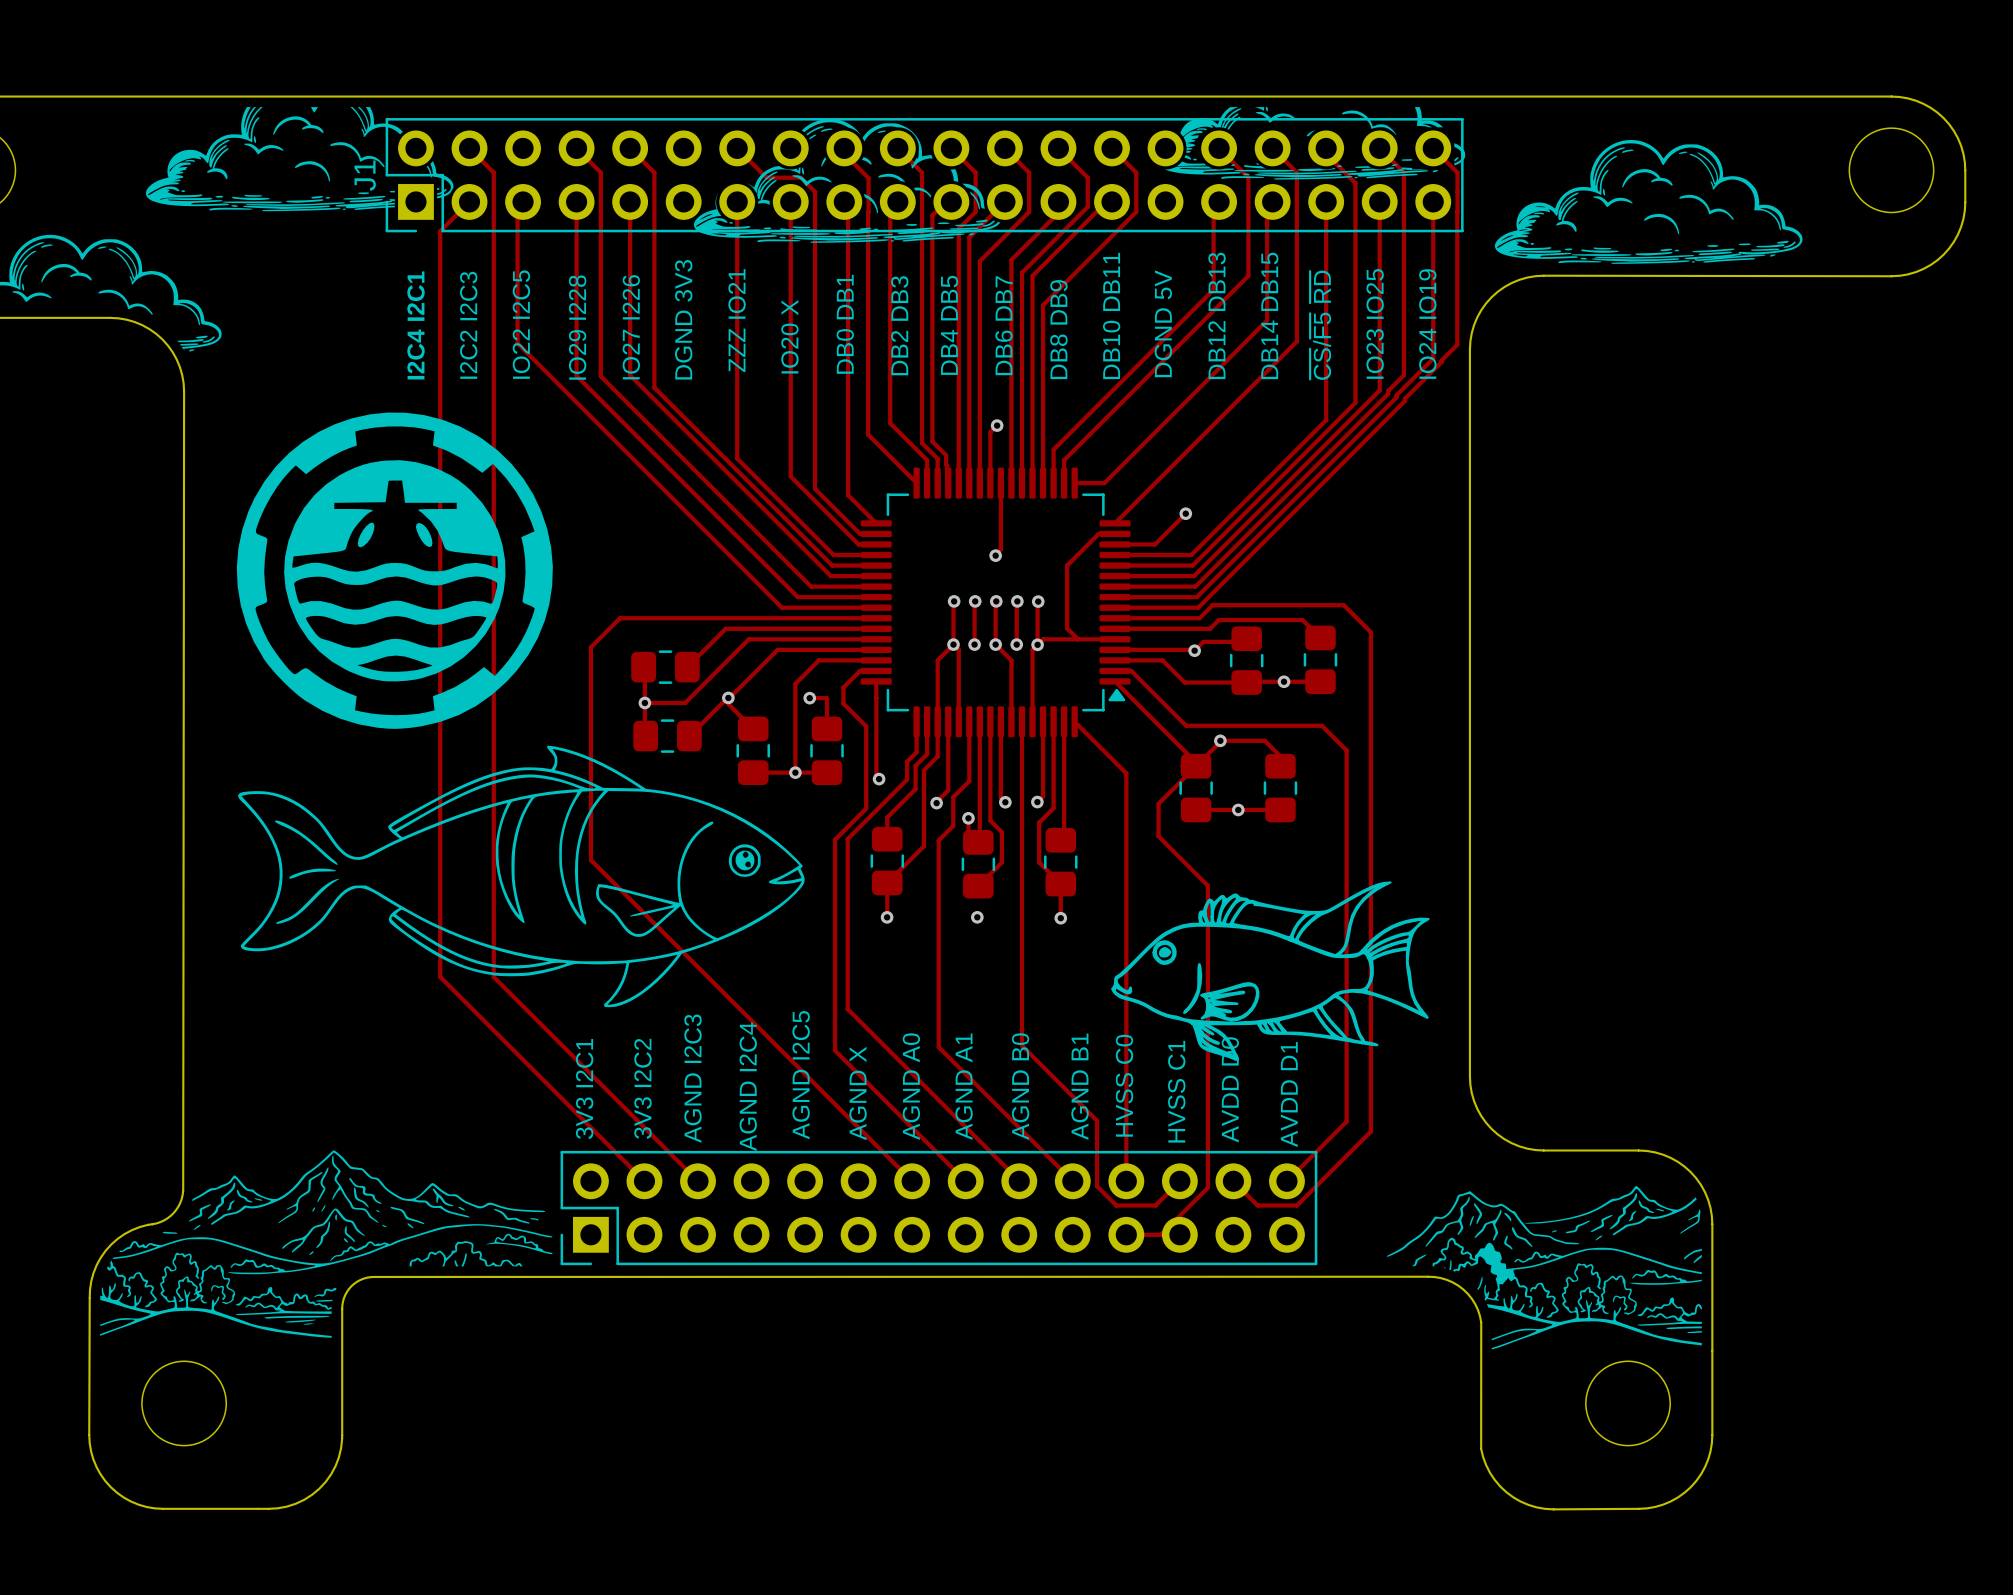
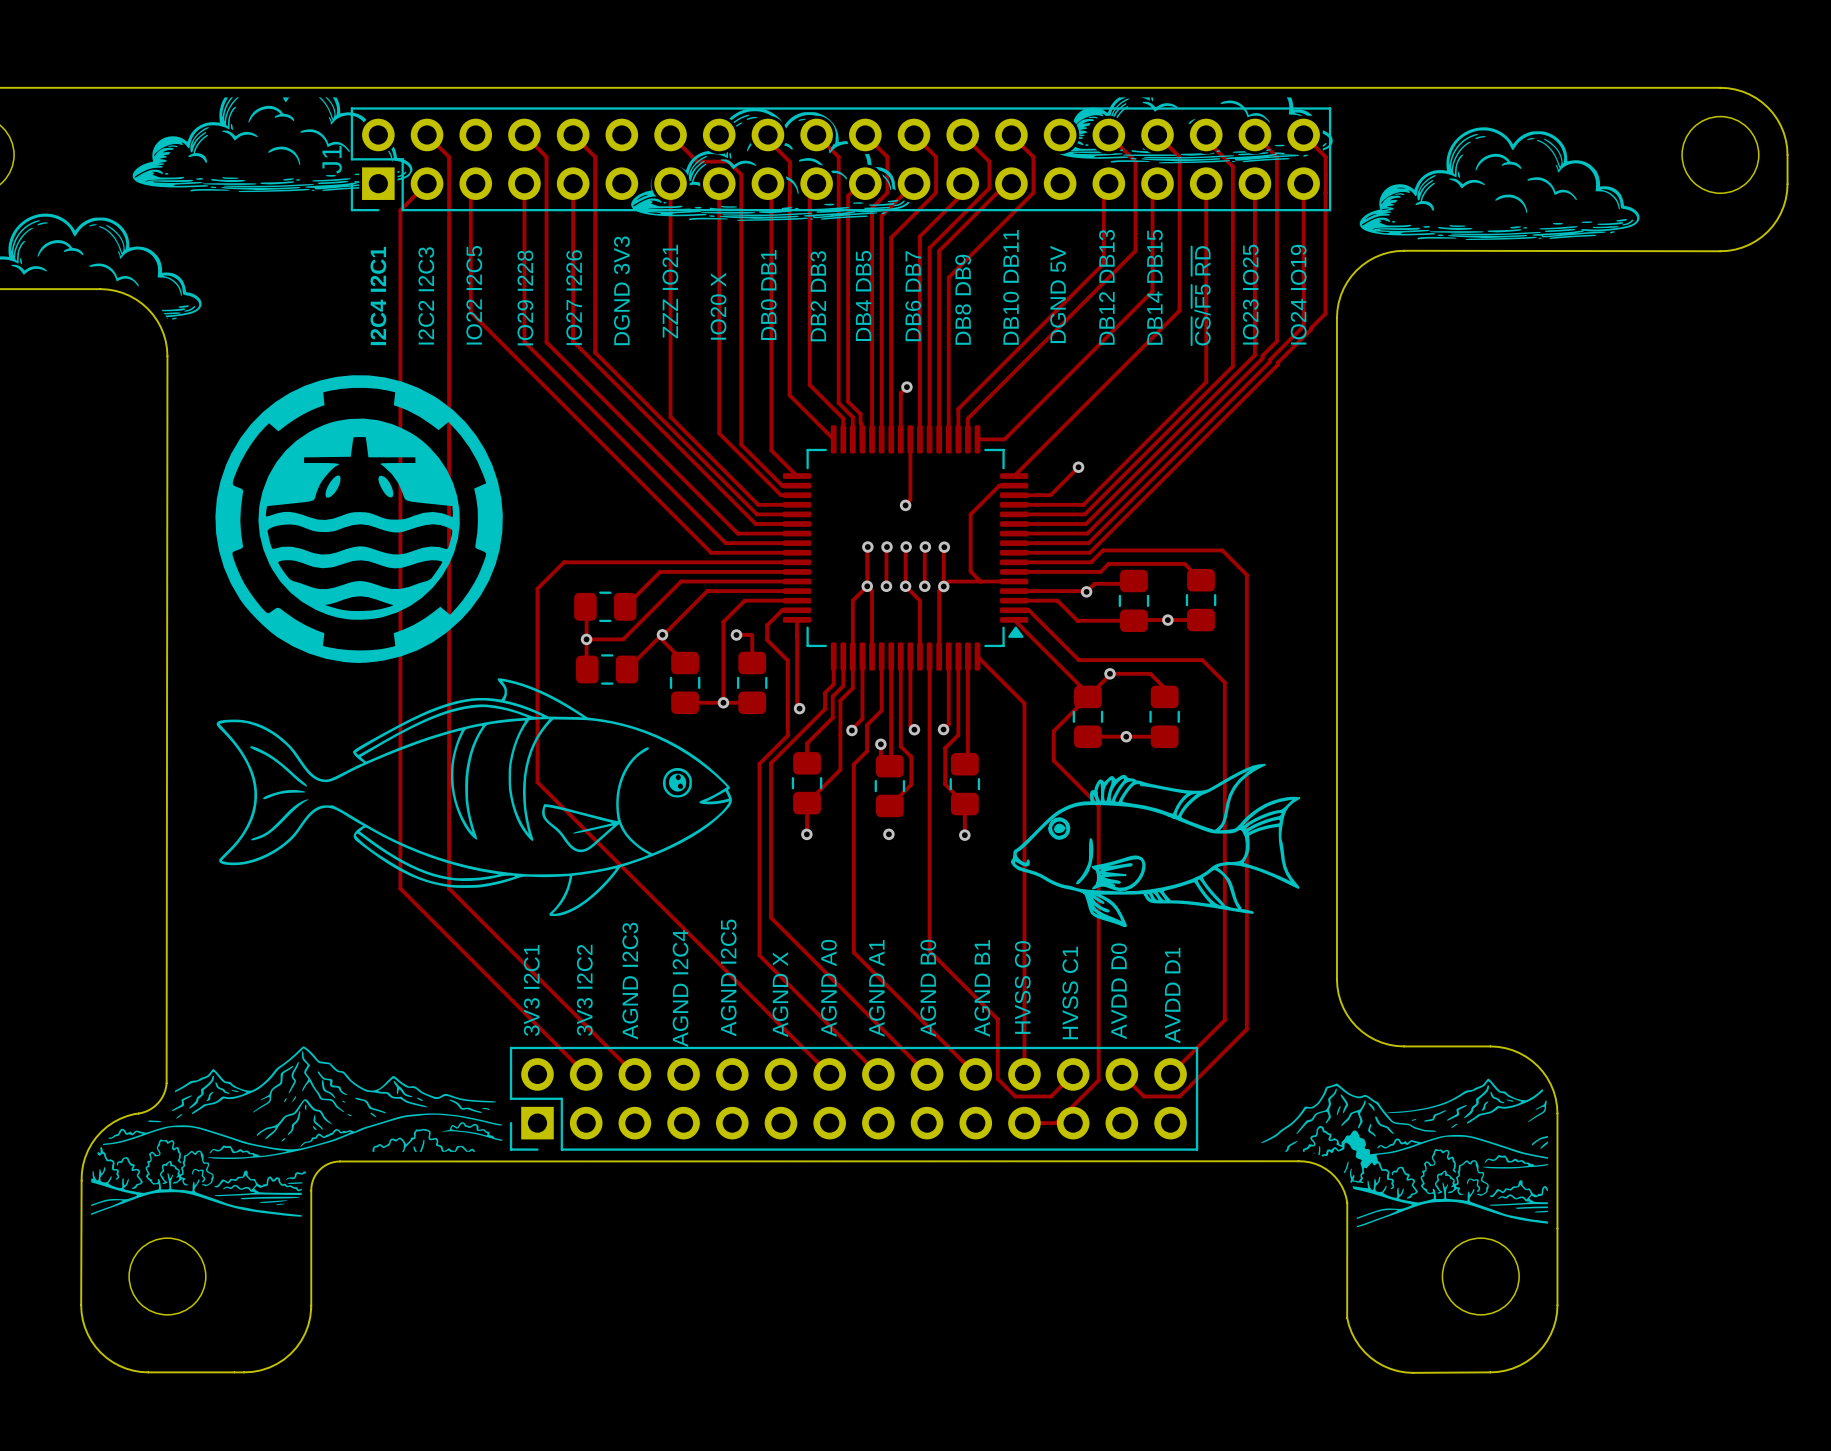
drawing position: (1270, 971) -> (1155, 845)

